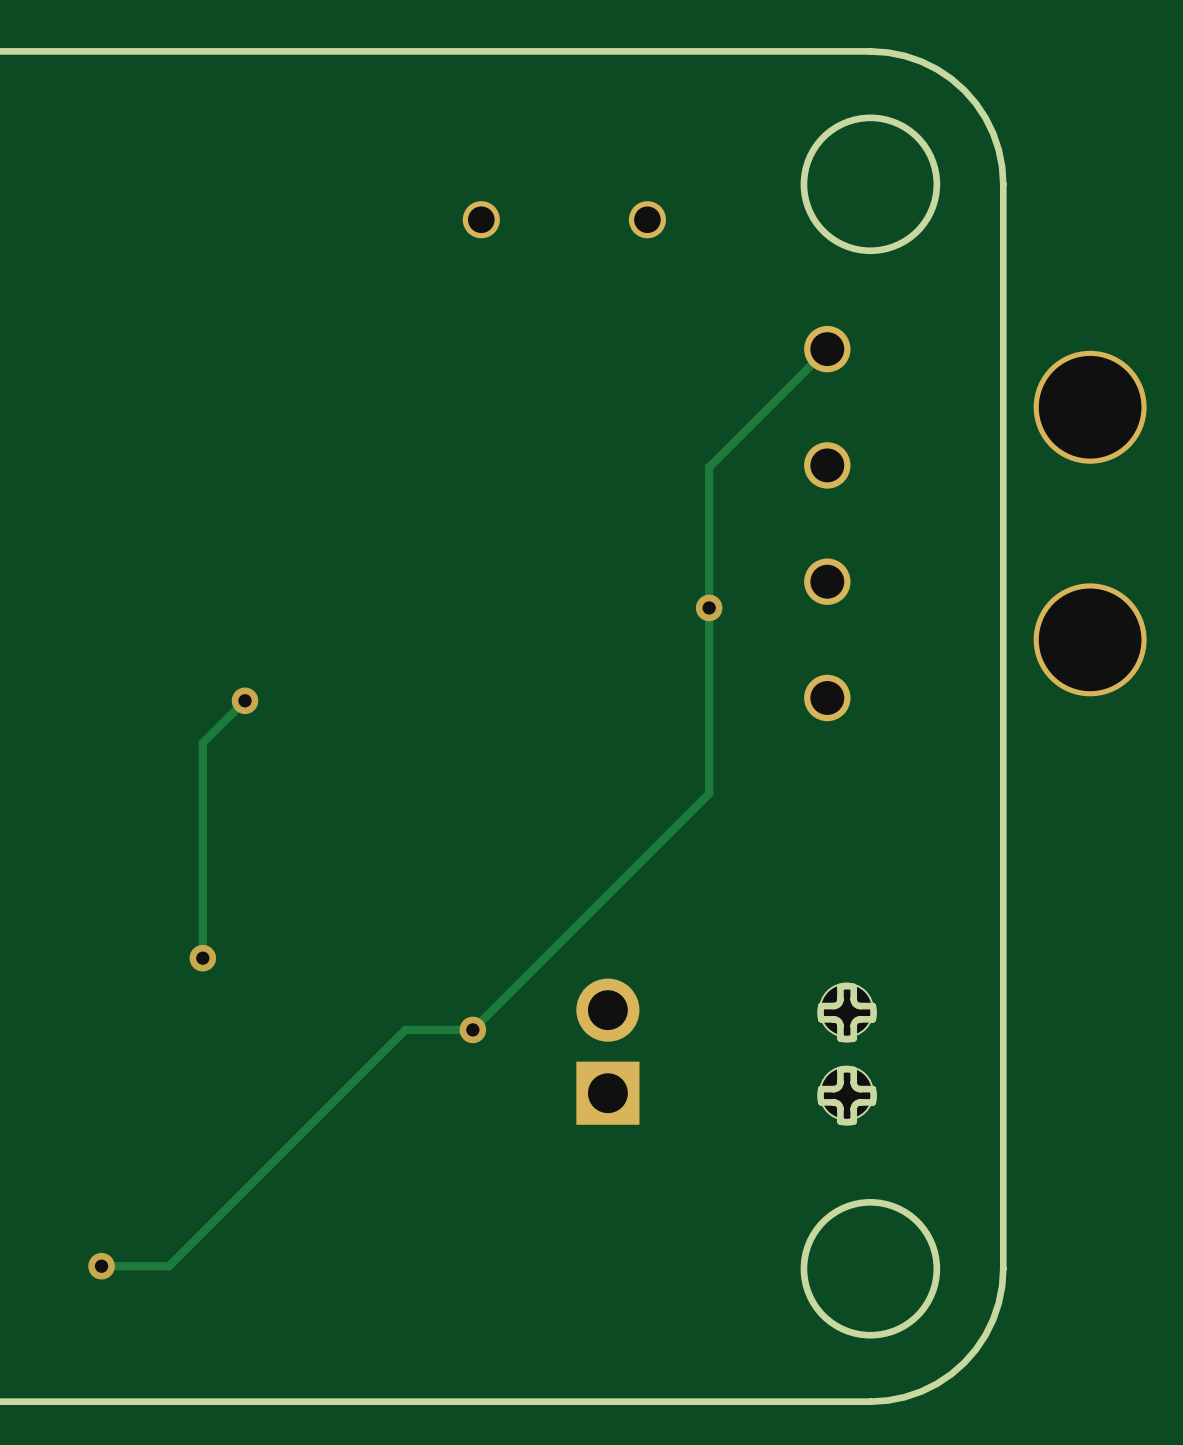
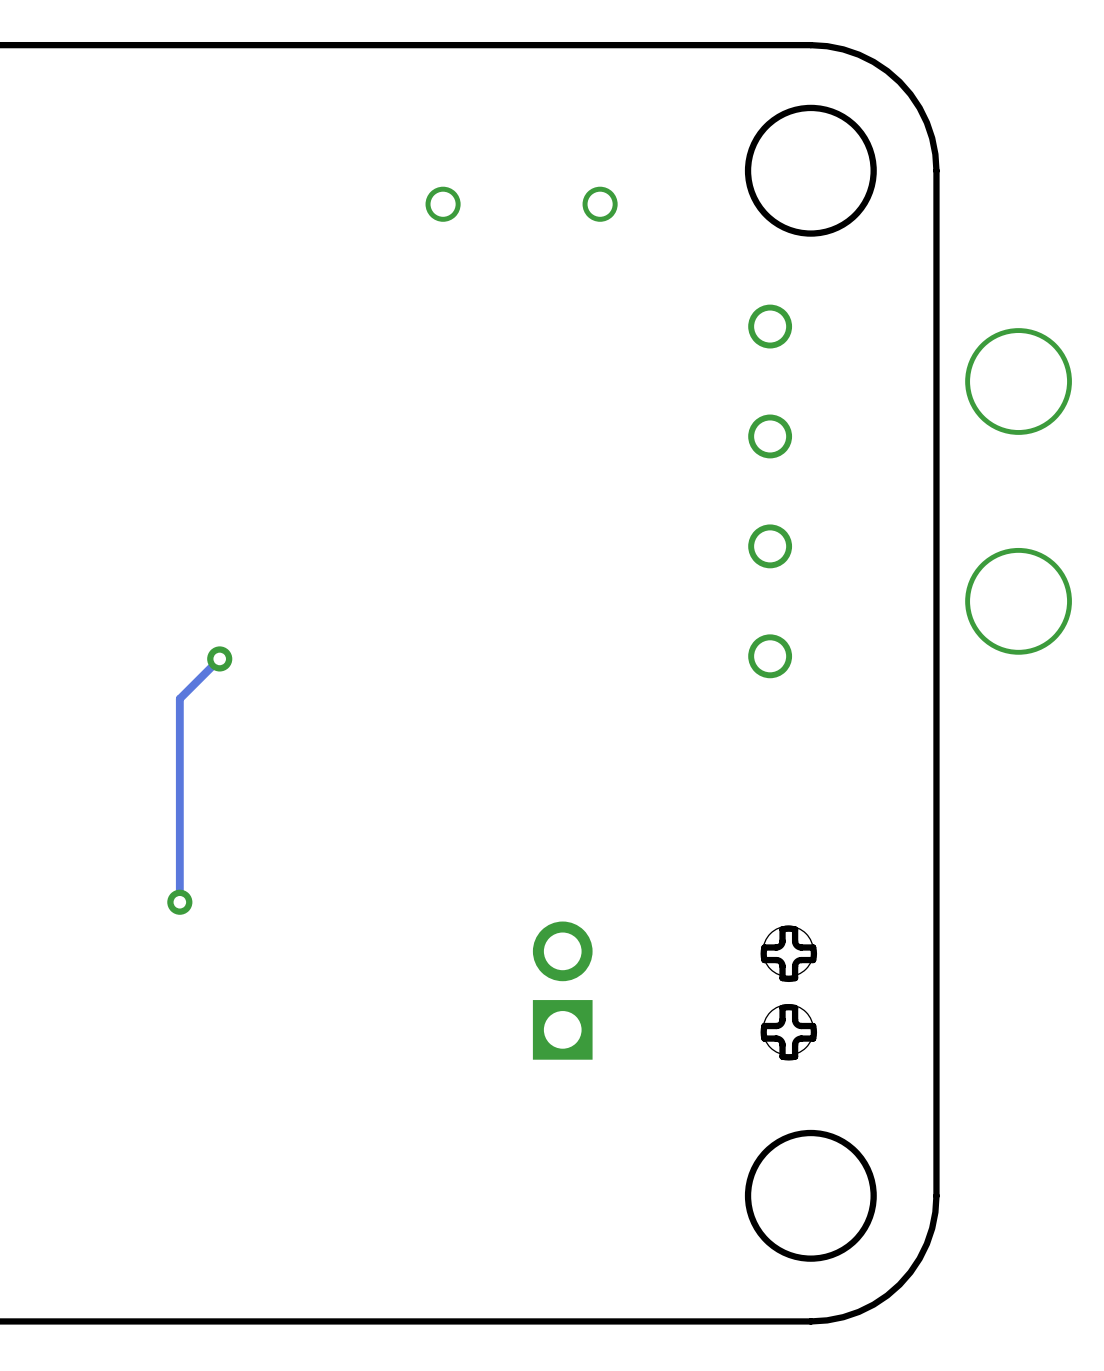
track: (827, 349) (709, 467) (709, 793) (472, 1029) (405, 1029) (169, 1266) (101, 1266) -> none
via: (709, 607) -> none
via: (472, 1029) -> none
via: (101, 1266) -> none

